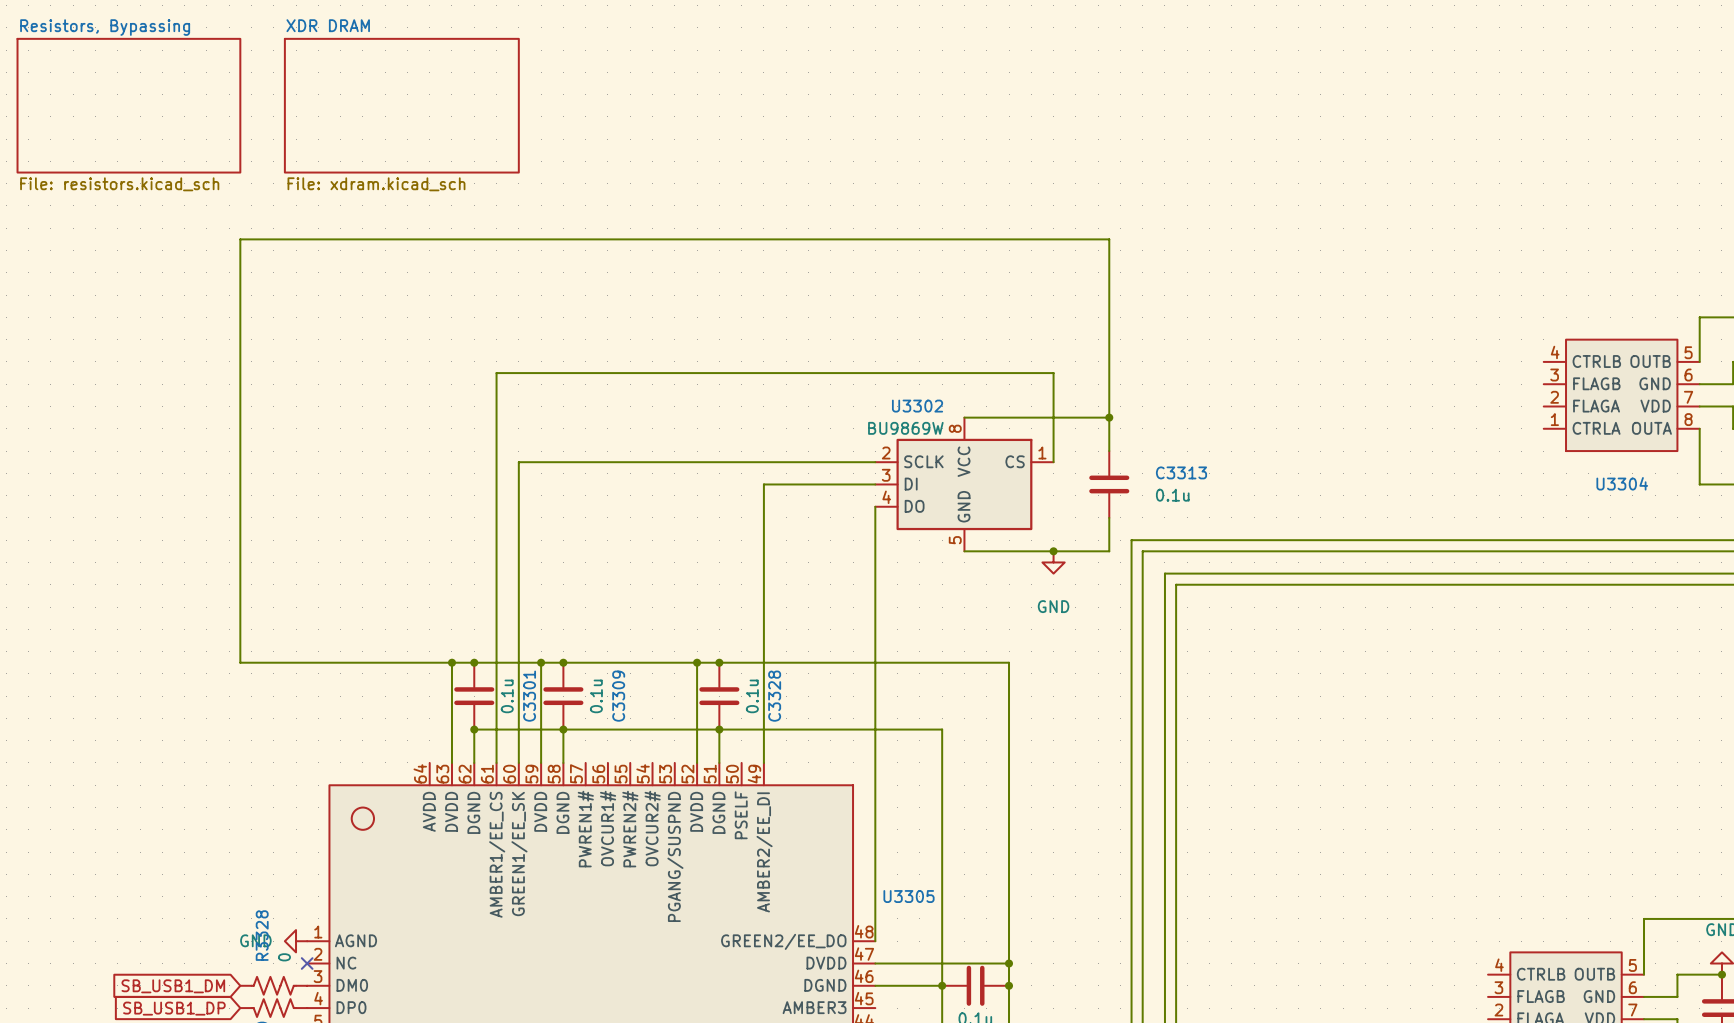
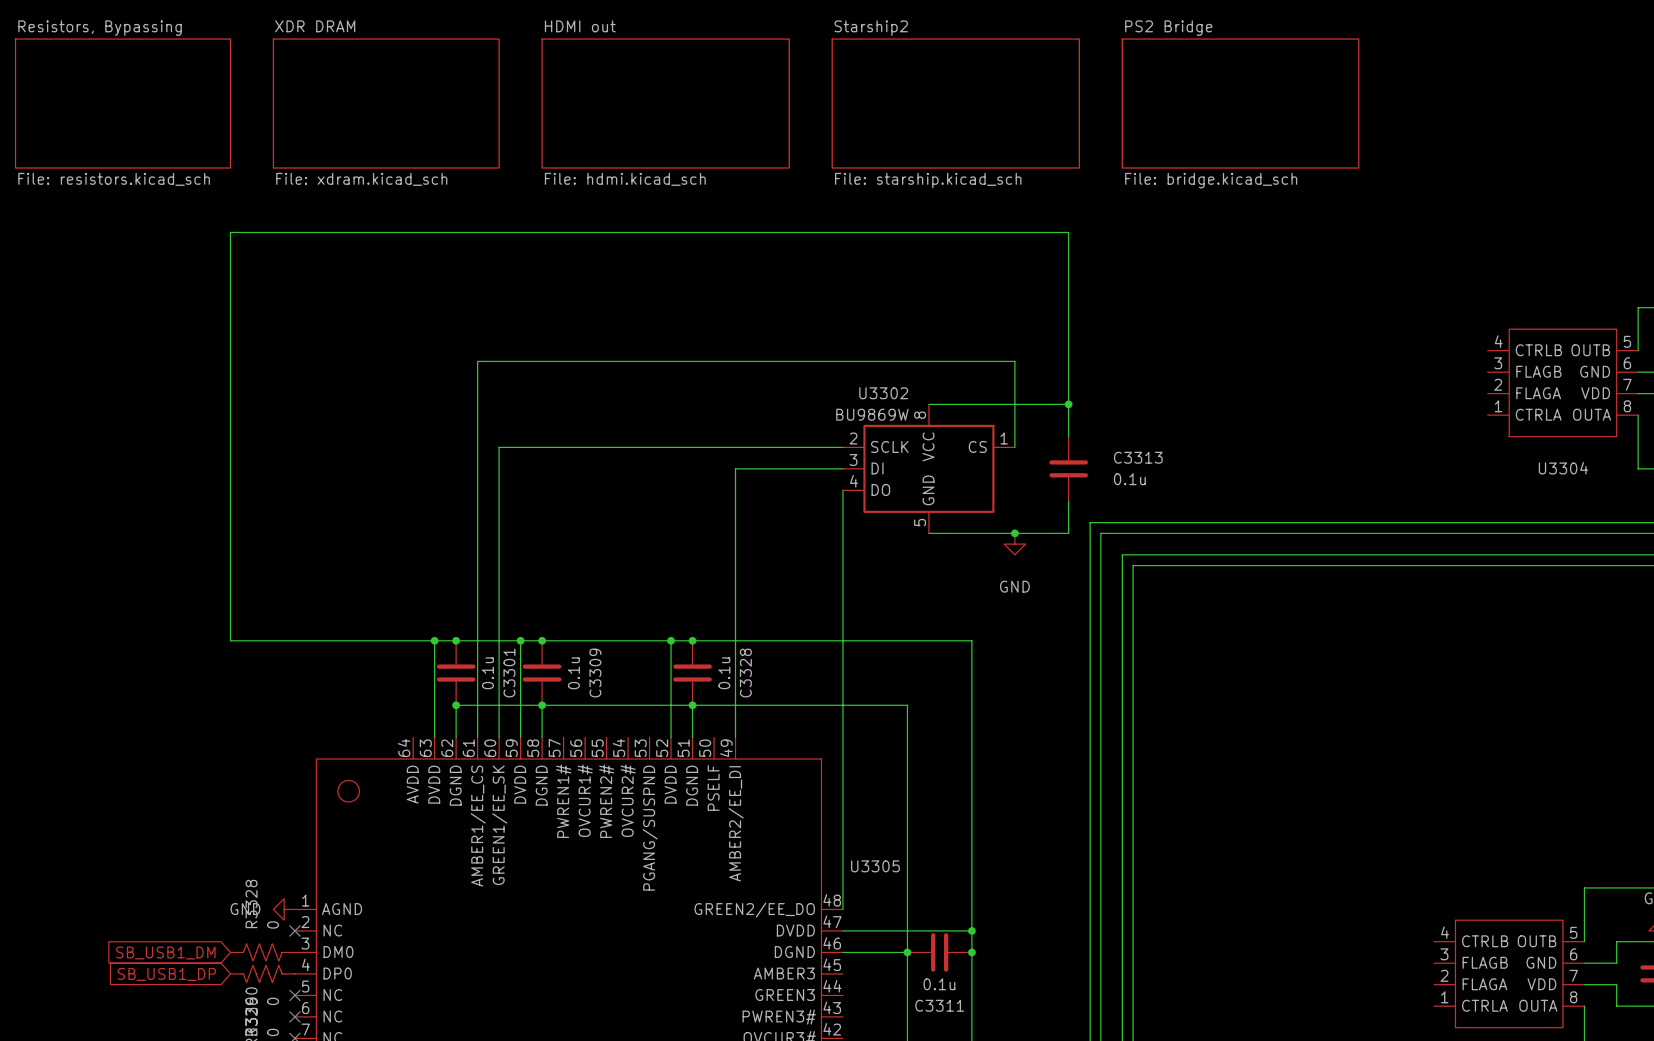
sheet HDMI out: none -> File: hdmi.kicad_sch (665, 103)
sheet Starship2: none -> File: starship.kicad_sch (955, 103)
sheet PS2 Bridge: none -> File: bridge.kicad_sch (1240, 103)

